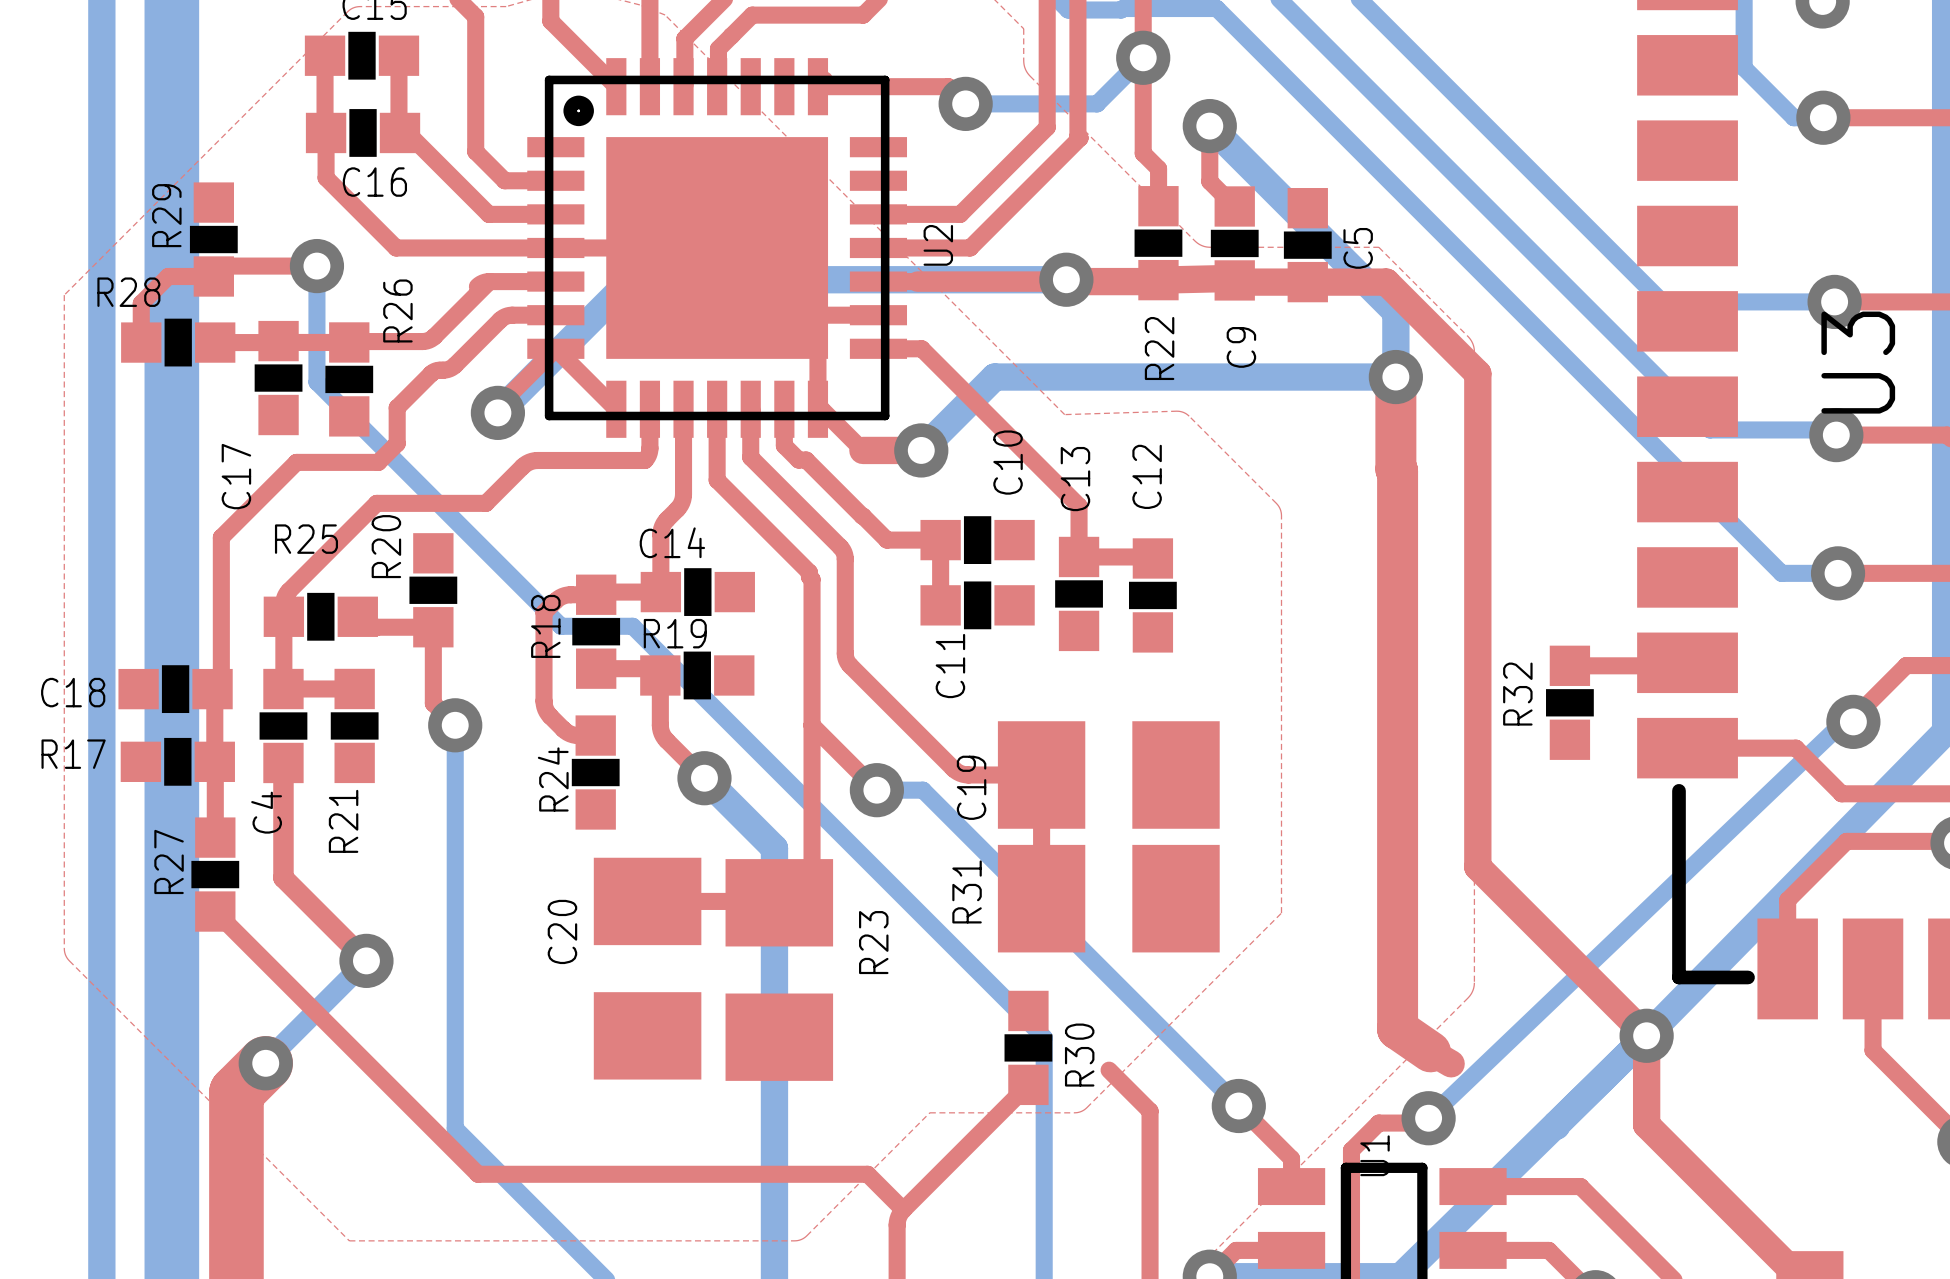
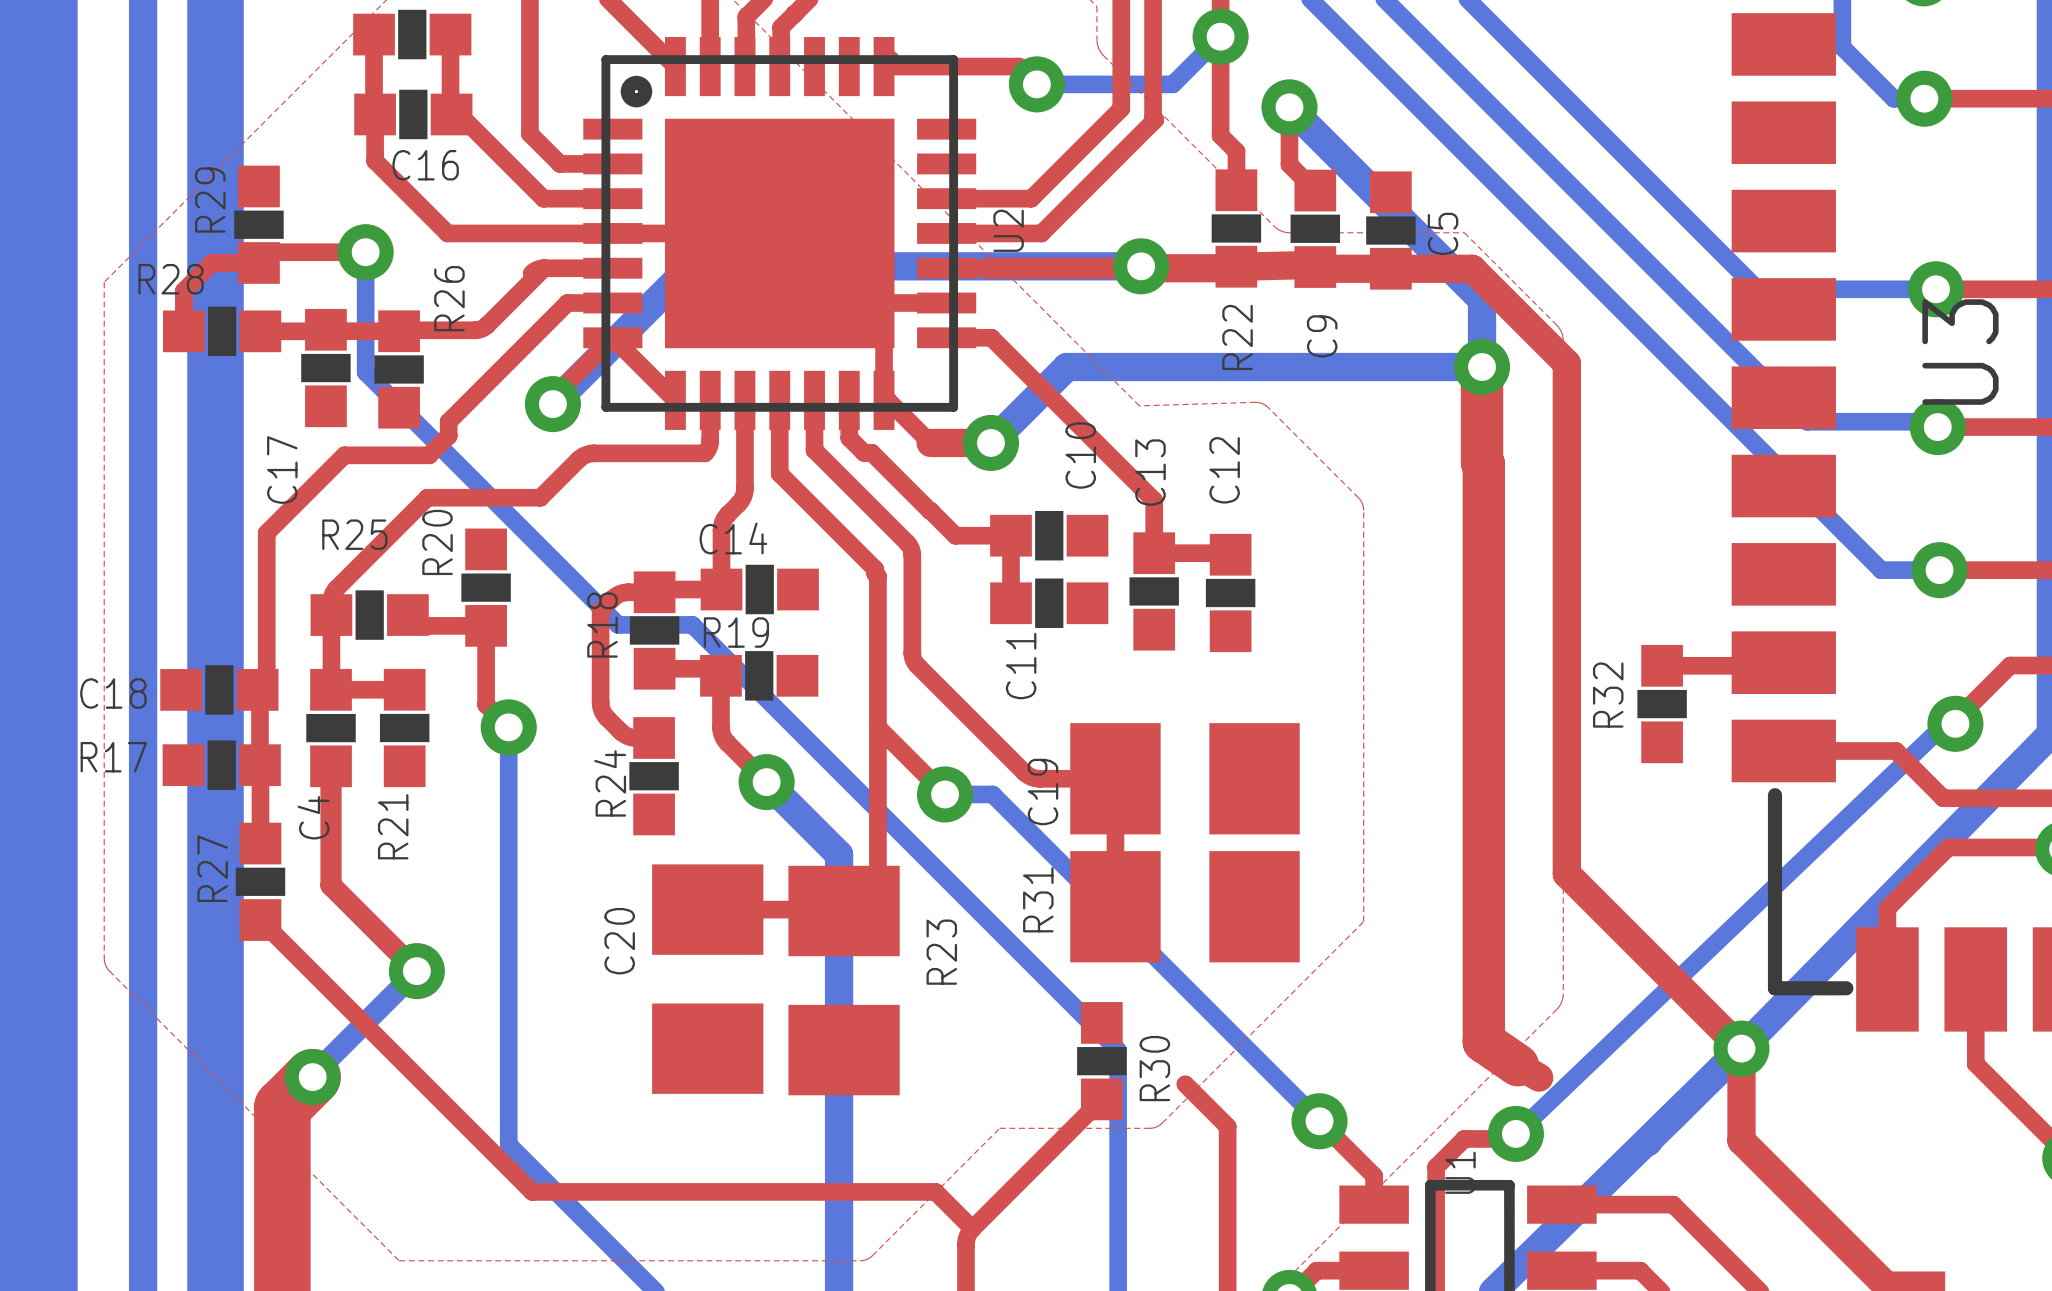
top track: (512, 315) (501, 318) (453, 366) (431, 373) (397, 407) (397, 429) -> (567, 303) (448, 421)

